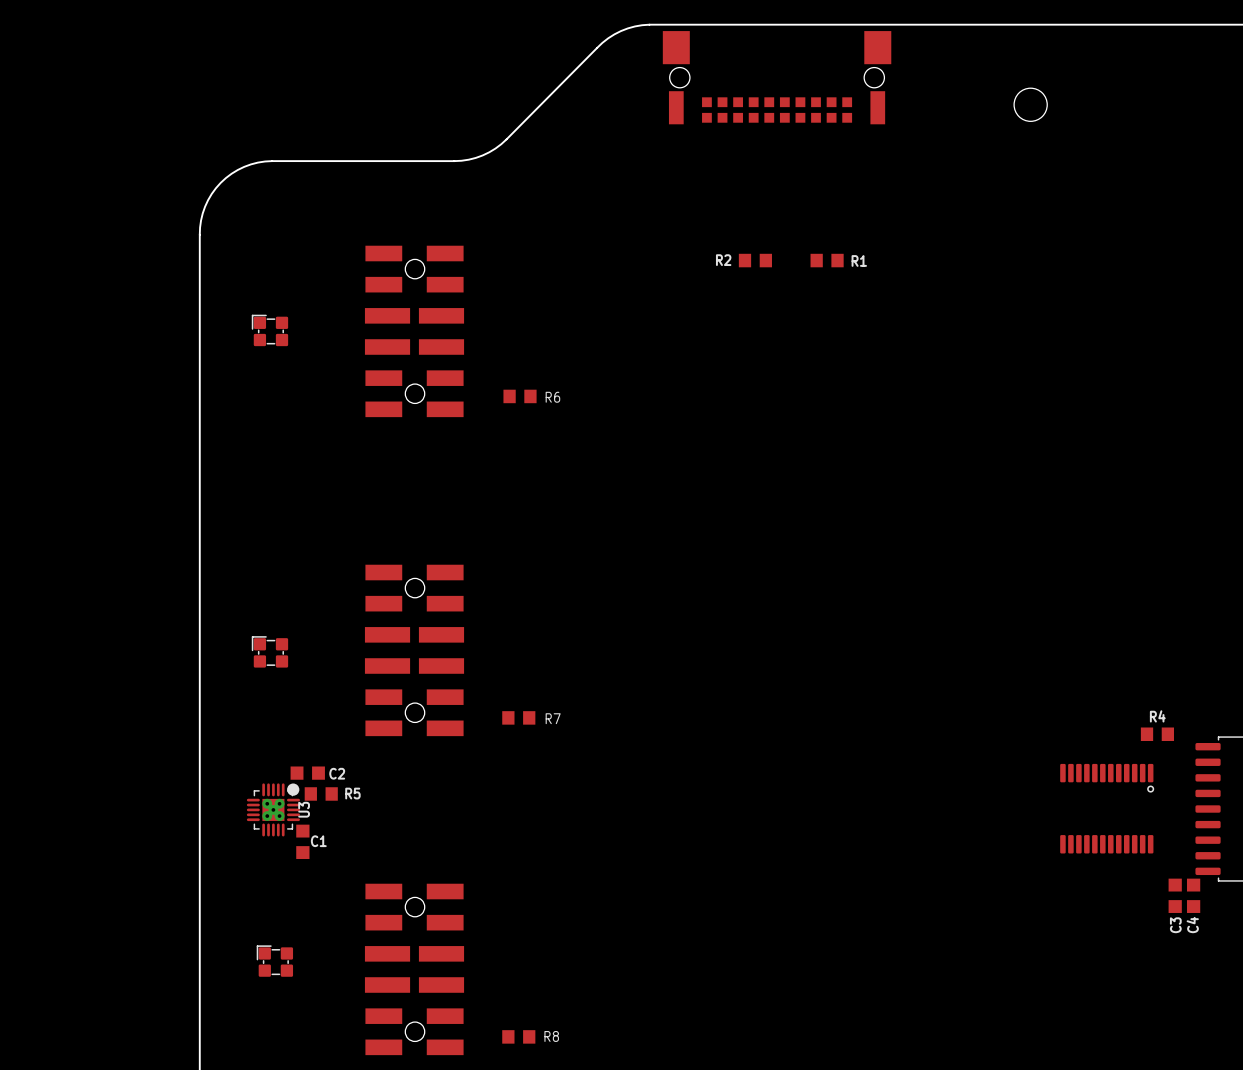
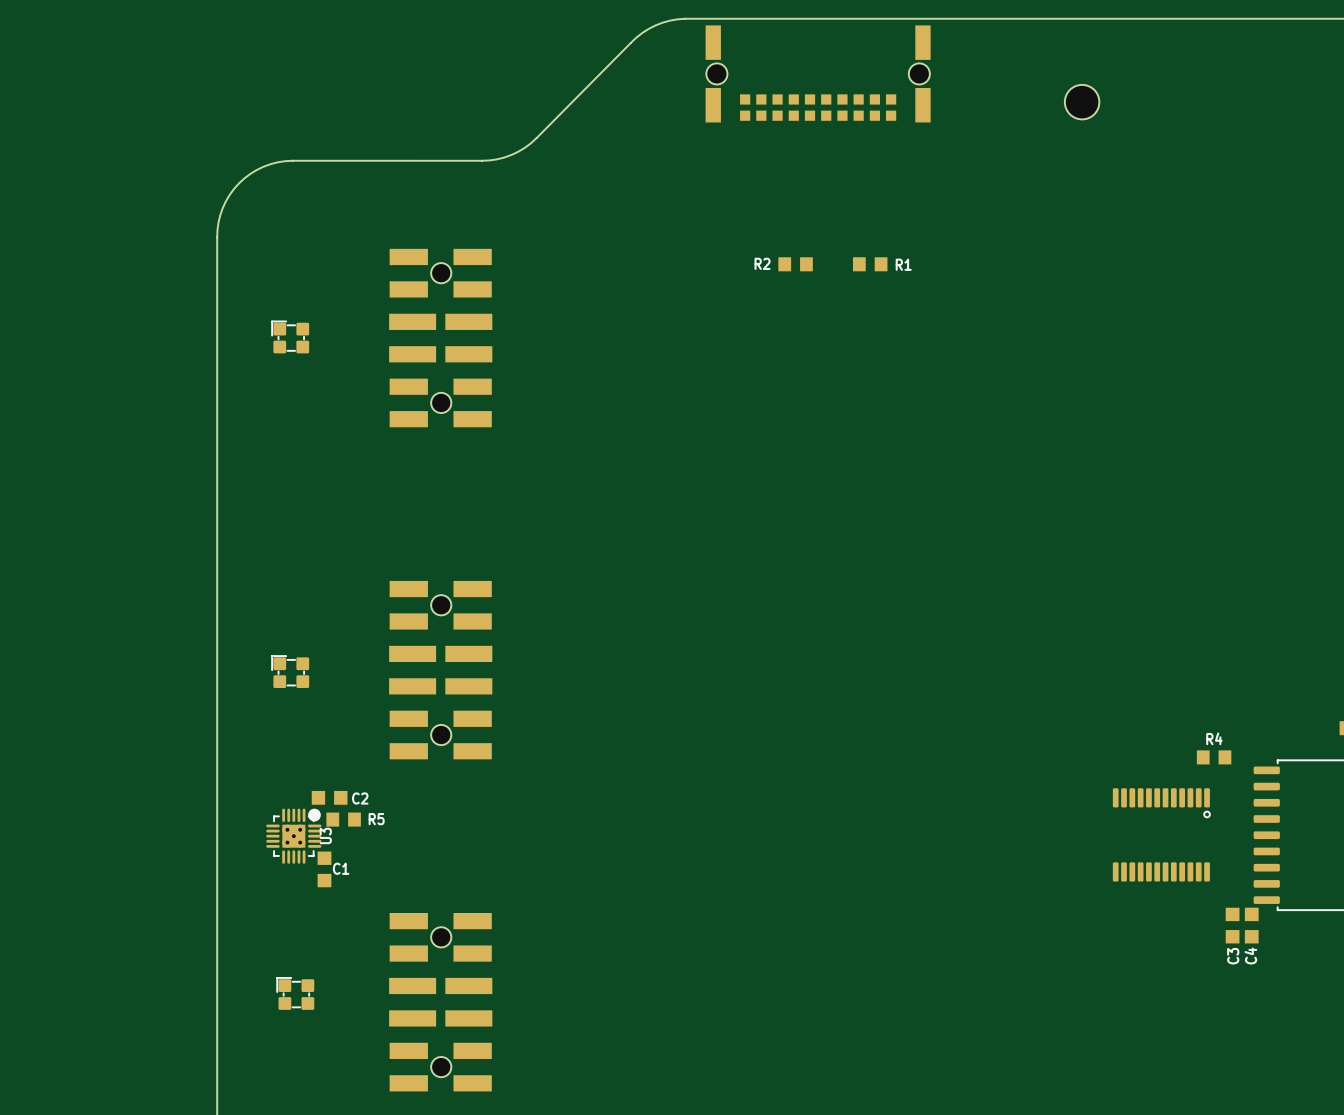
part footprint: [662, 31, 892, 125] -> [705, 25, 931, 123]
R6: (520, 396) -> none
R7: (518, 717) -> none
R8: (518, 1036) -> none

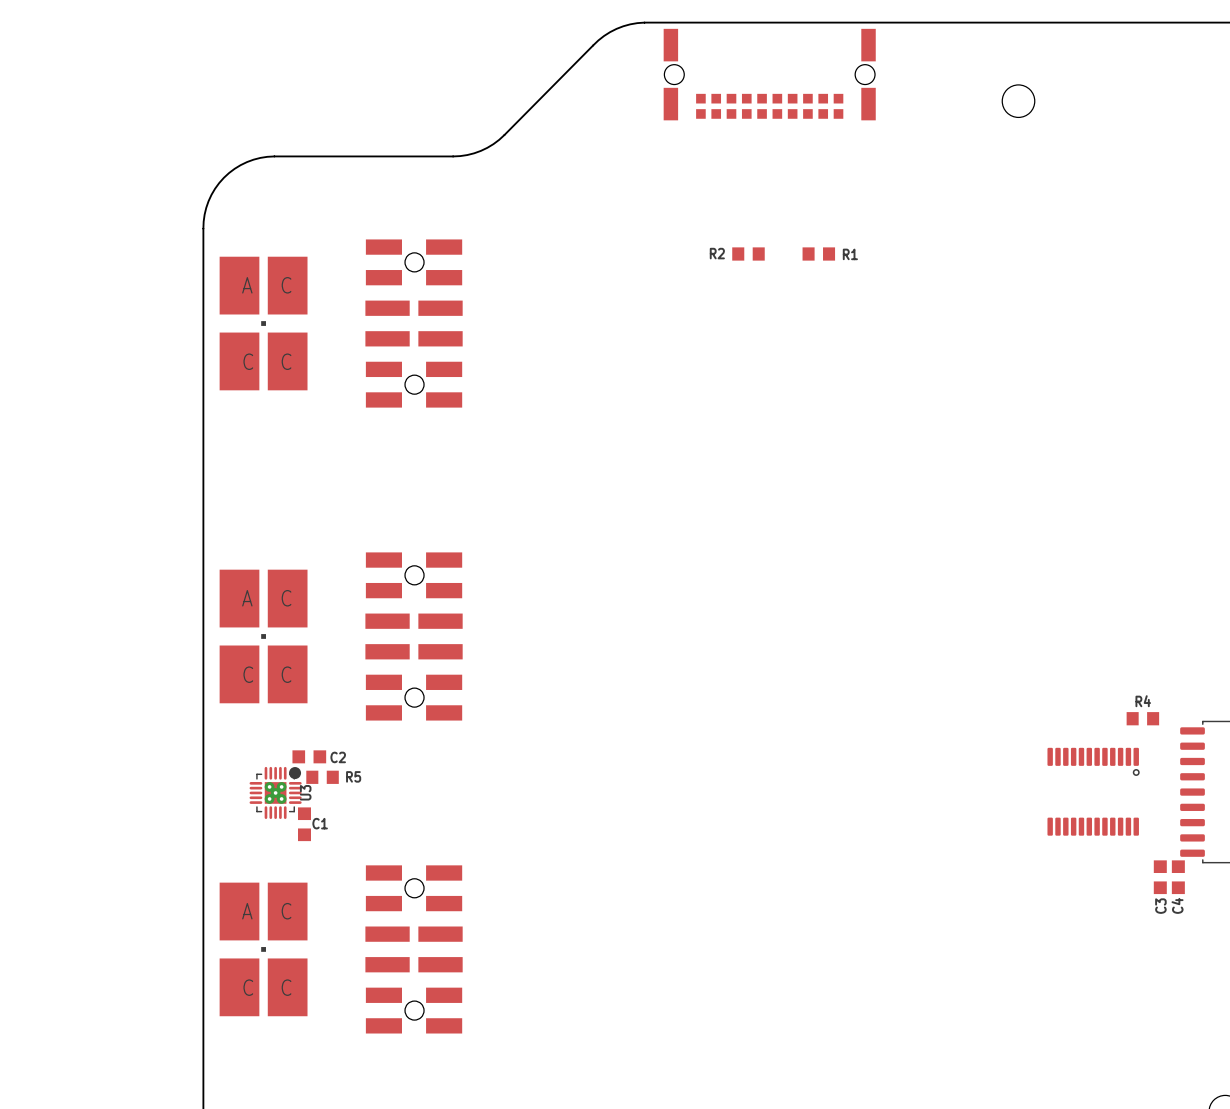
part footprint: [271, 320, 310, 354] -> [219, 256, 308, 391]
part footprint: [271, 655, 310, 689] -> [219, 569, 308, 704]
part: (295, 993) -> none
part: none -> (263, 949)

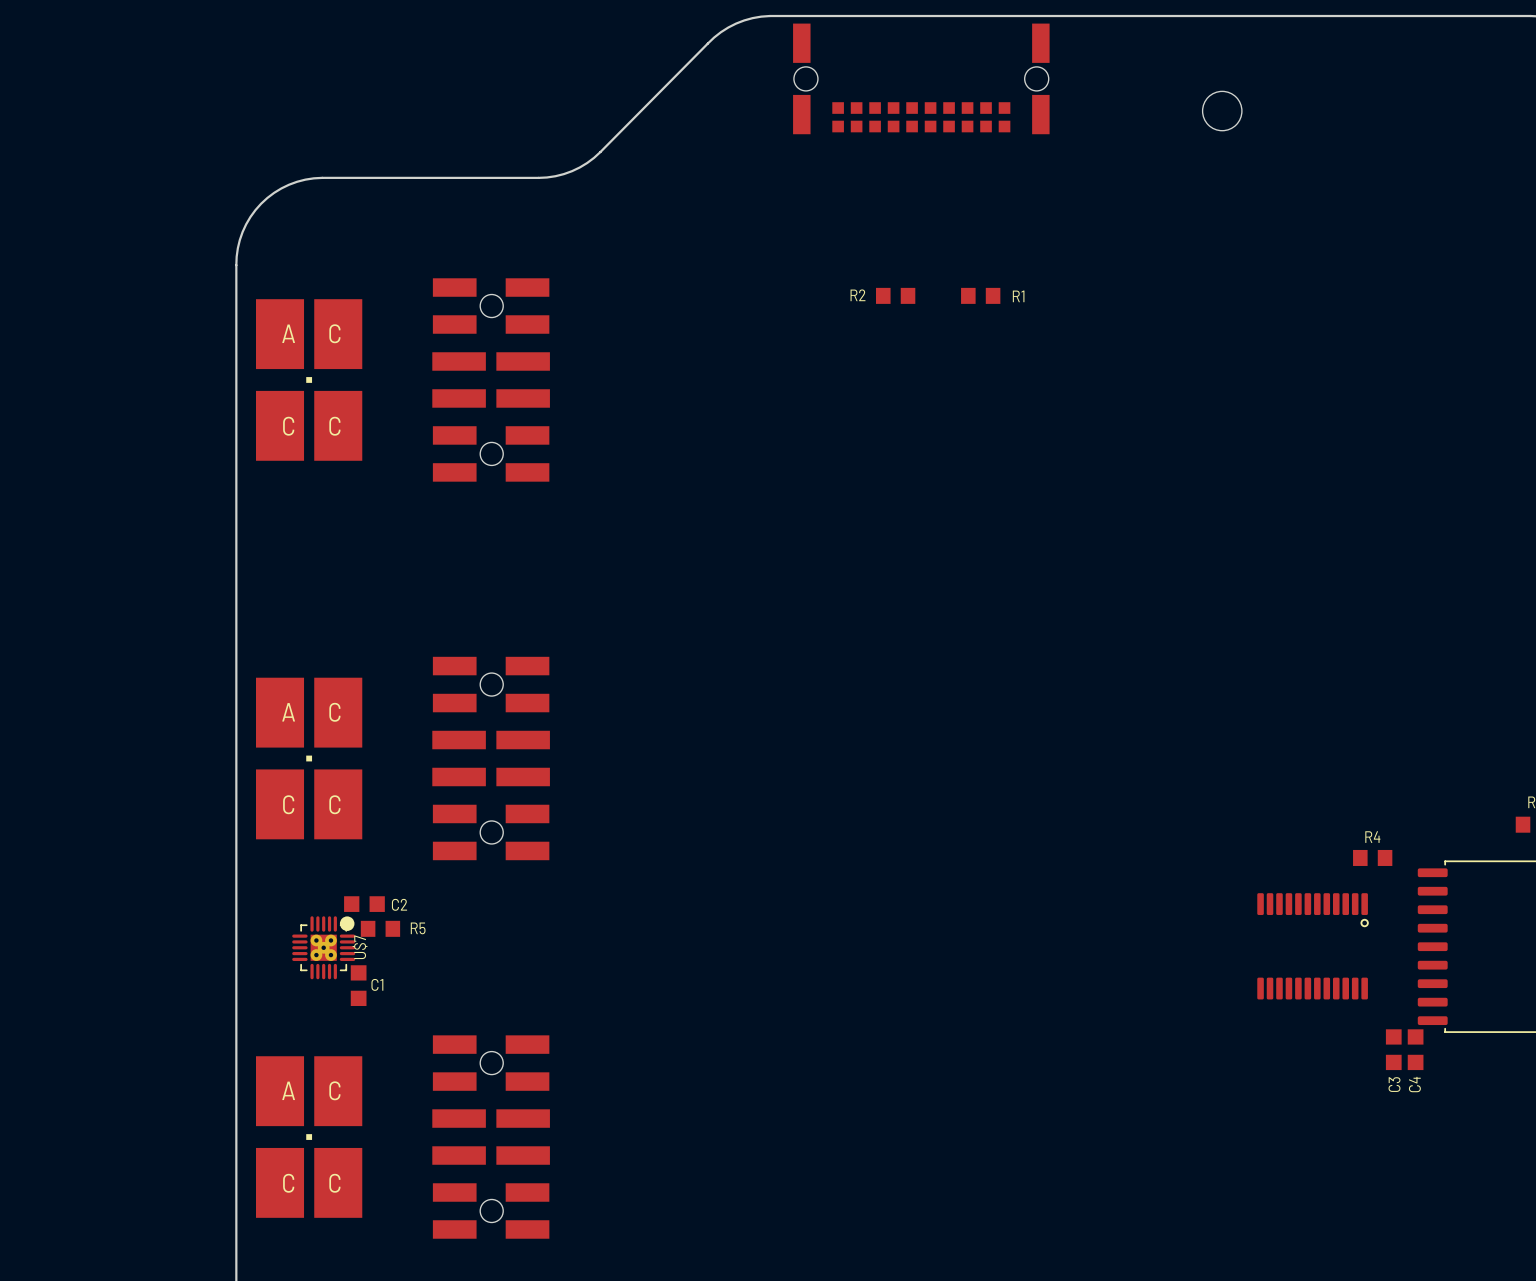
U3 name: U3 (305, 792) -> U$7 (360, 947)

